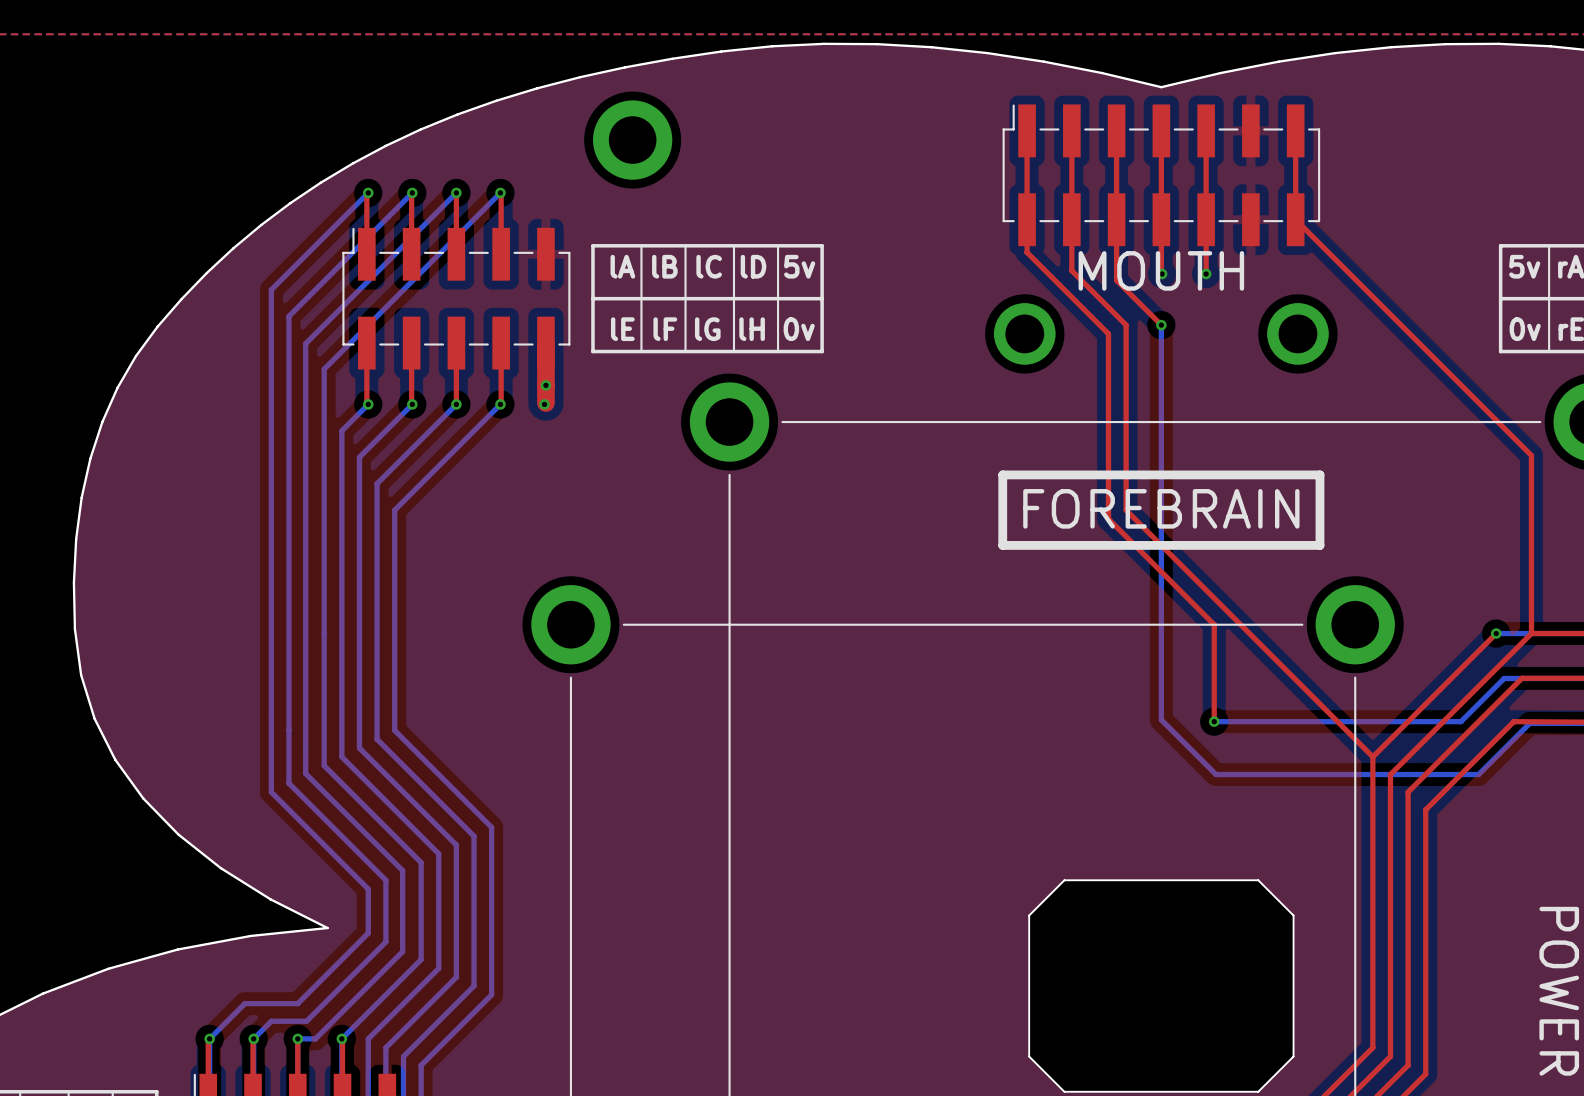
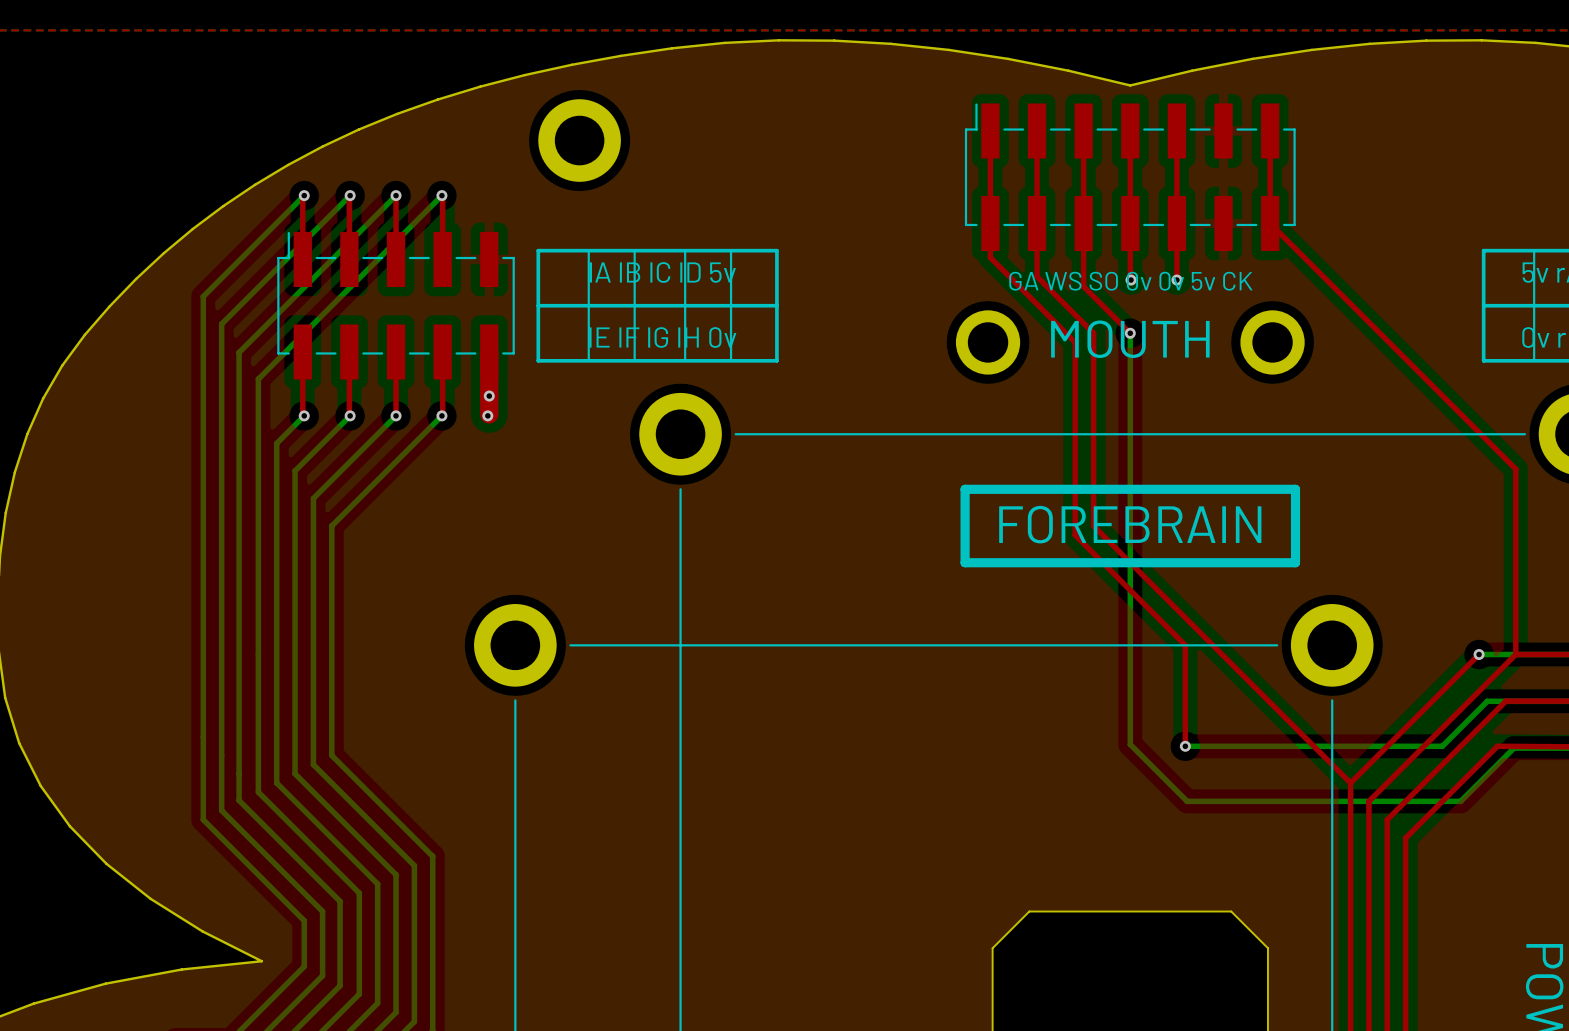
text: MOUTH (1161, 270) -> GA WS SO 0v 0v 5v CK (1130, 281)
text: none -> MOUTH (1130, 339)

